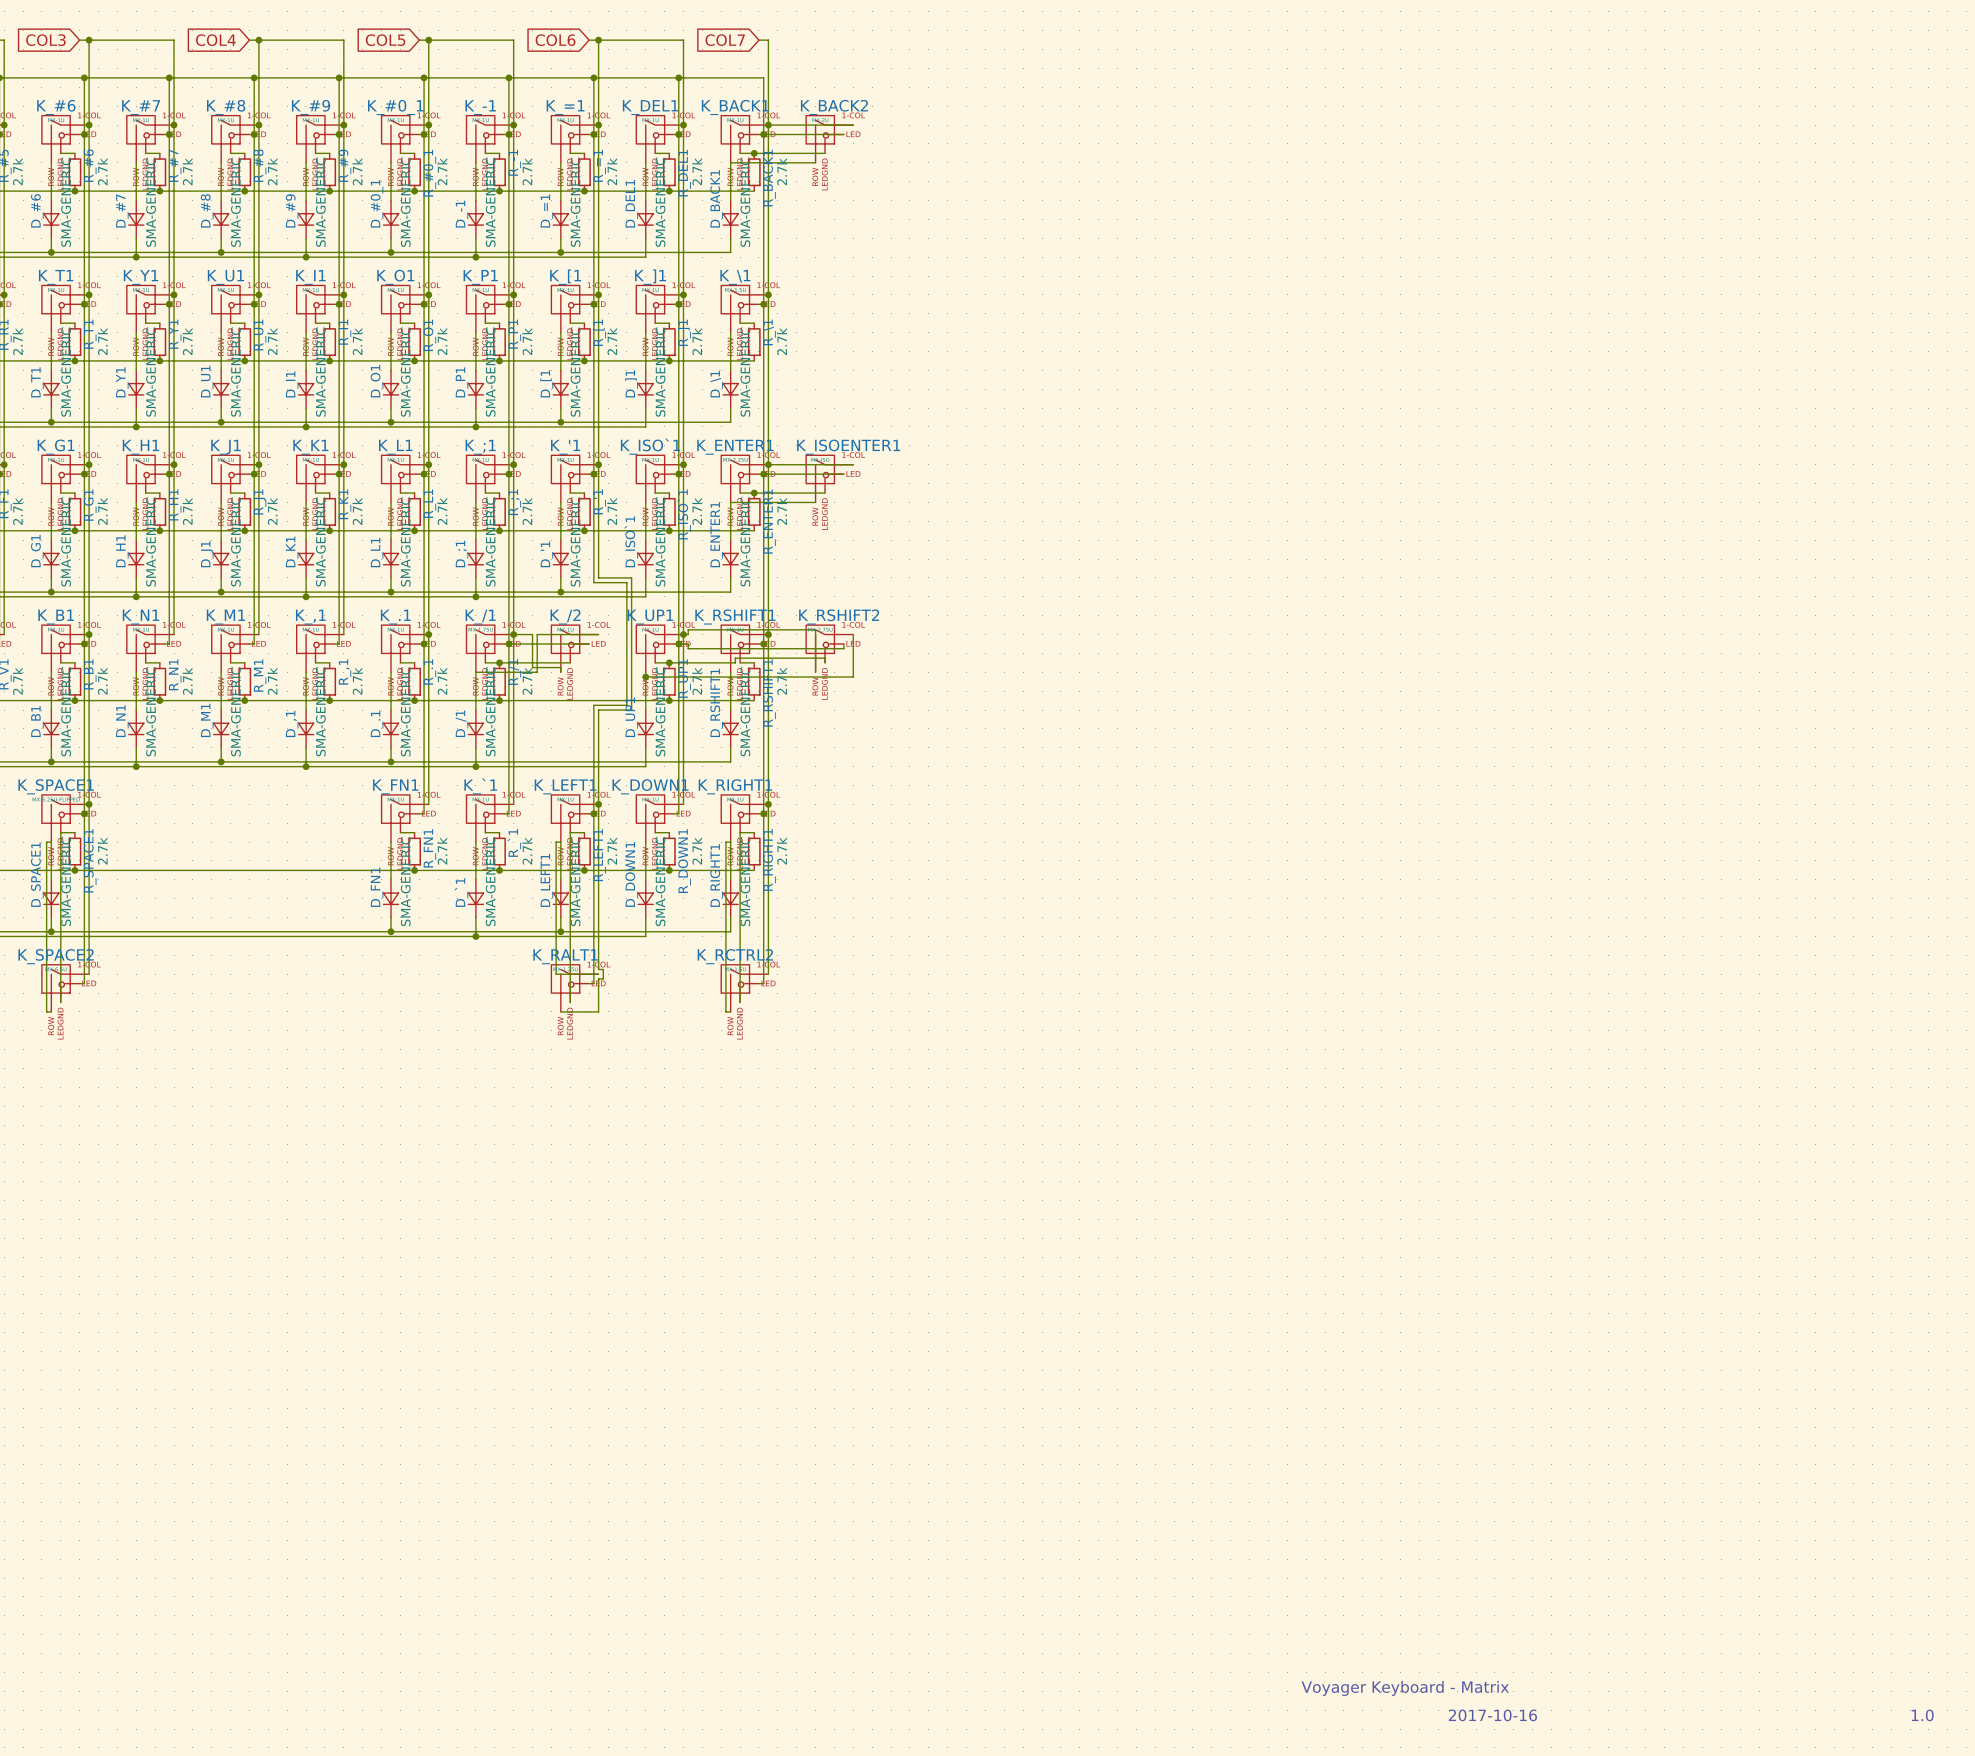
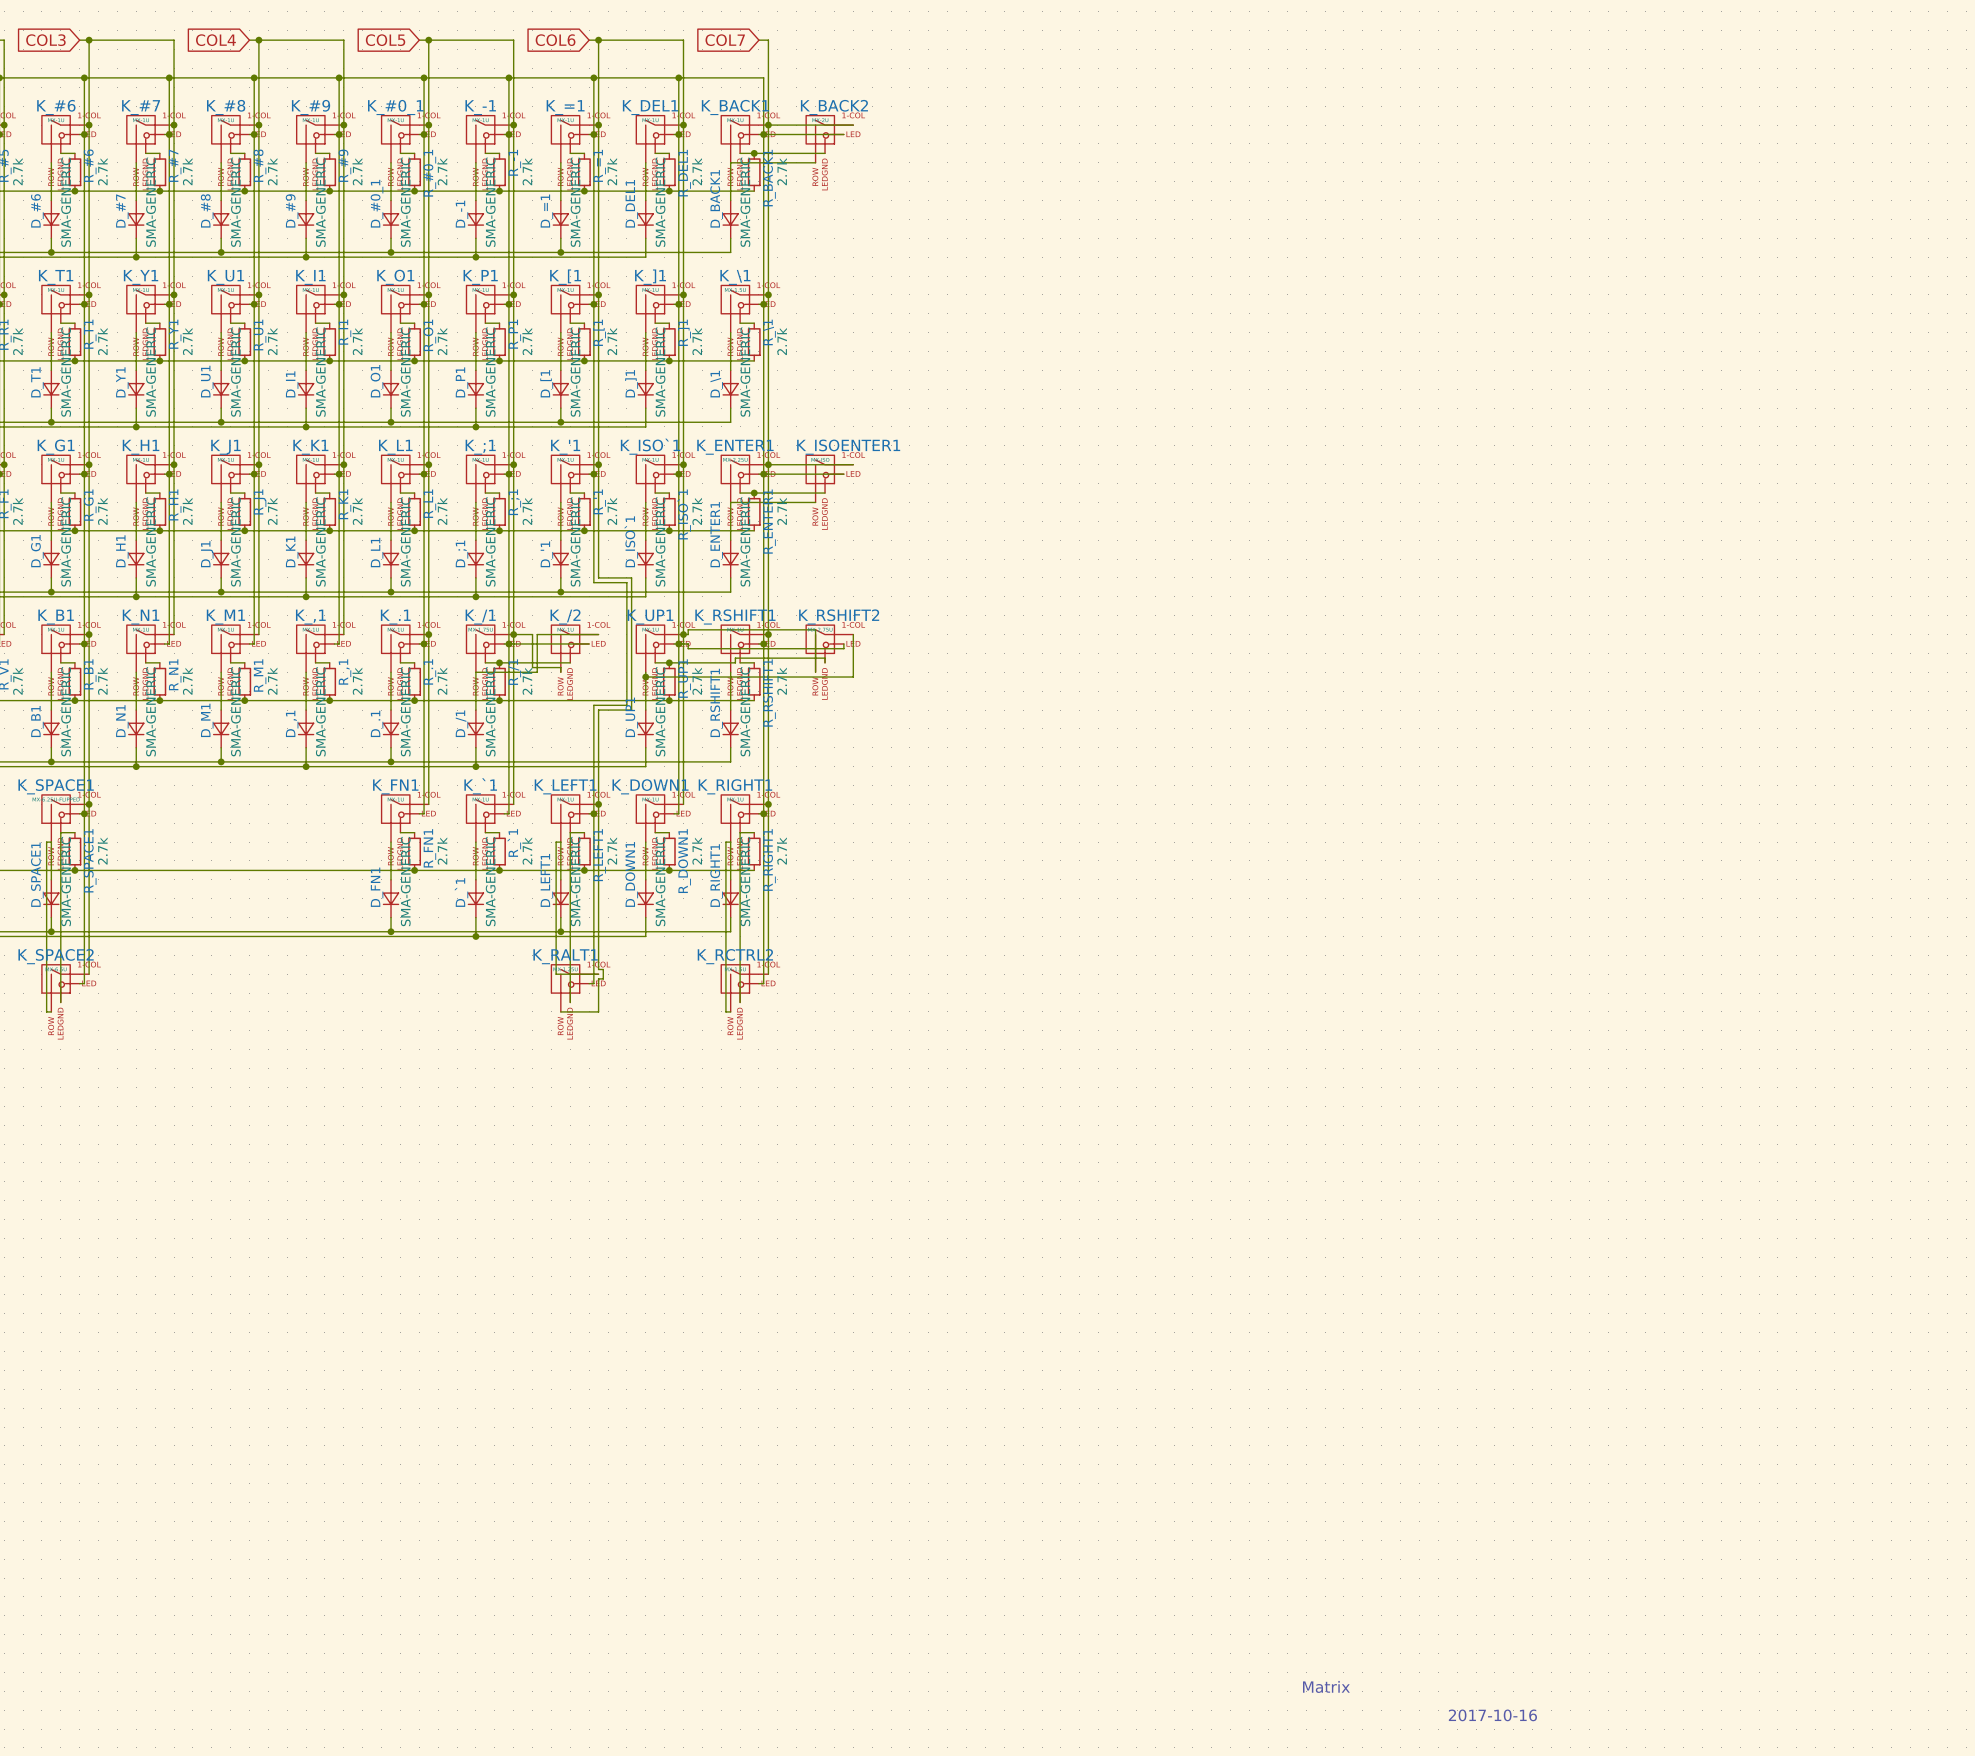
text: Voyager Keyboard - Matrix (1405, 1688) -> Matrix (1326, 1686)
text: 1.0 (1922, 1715) -> none

